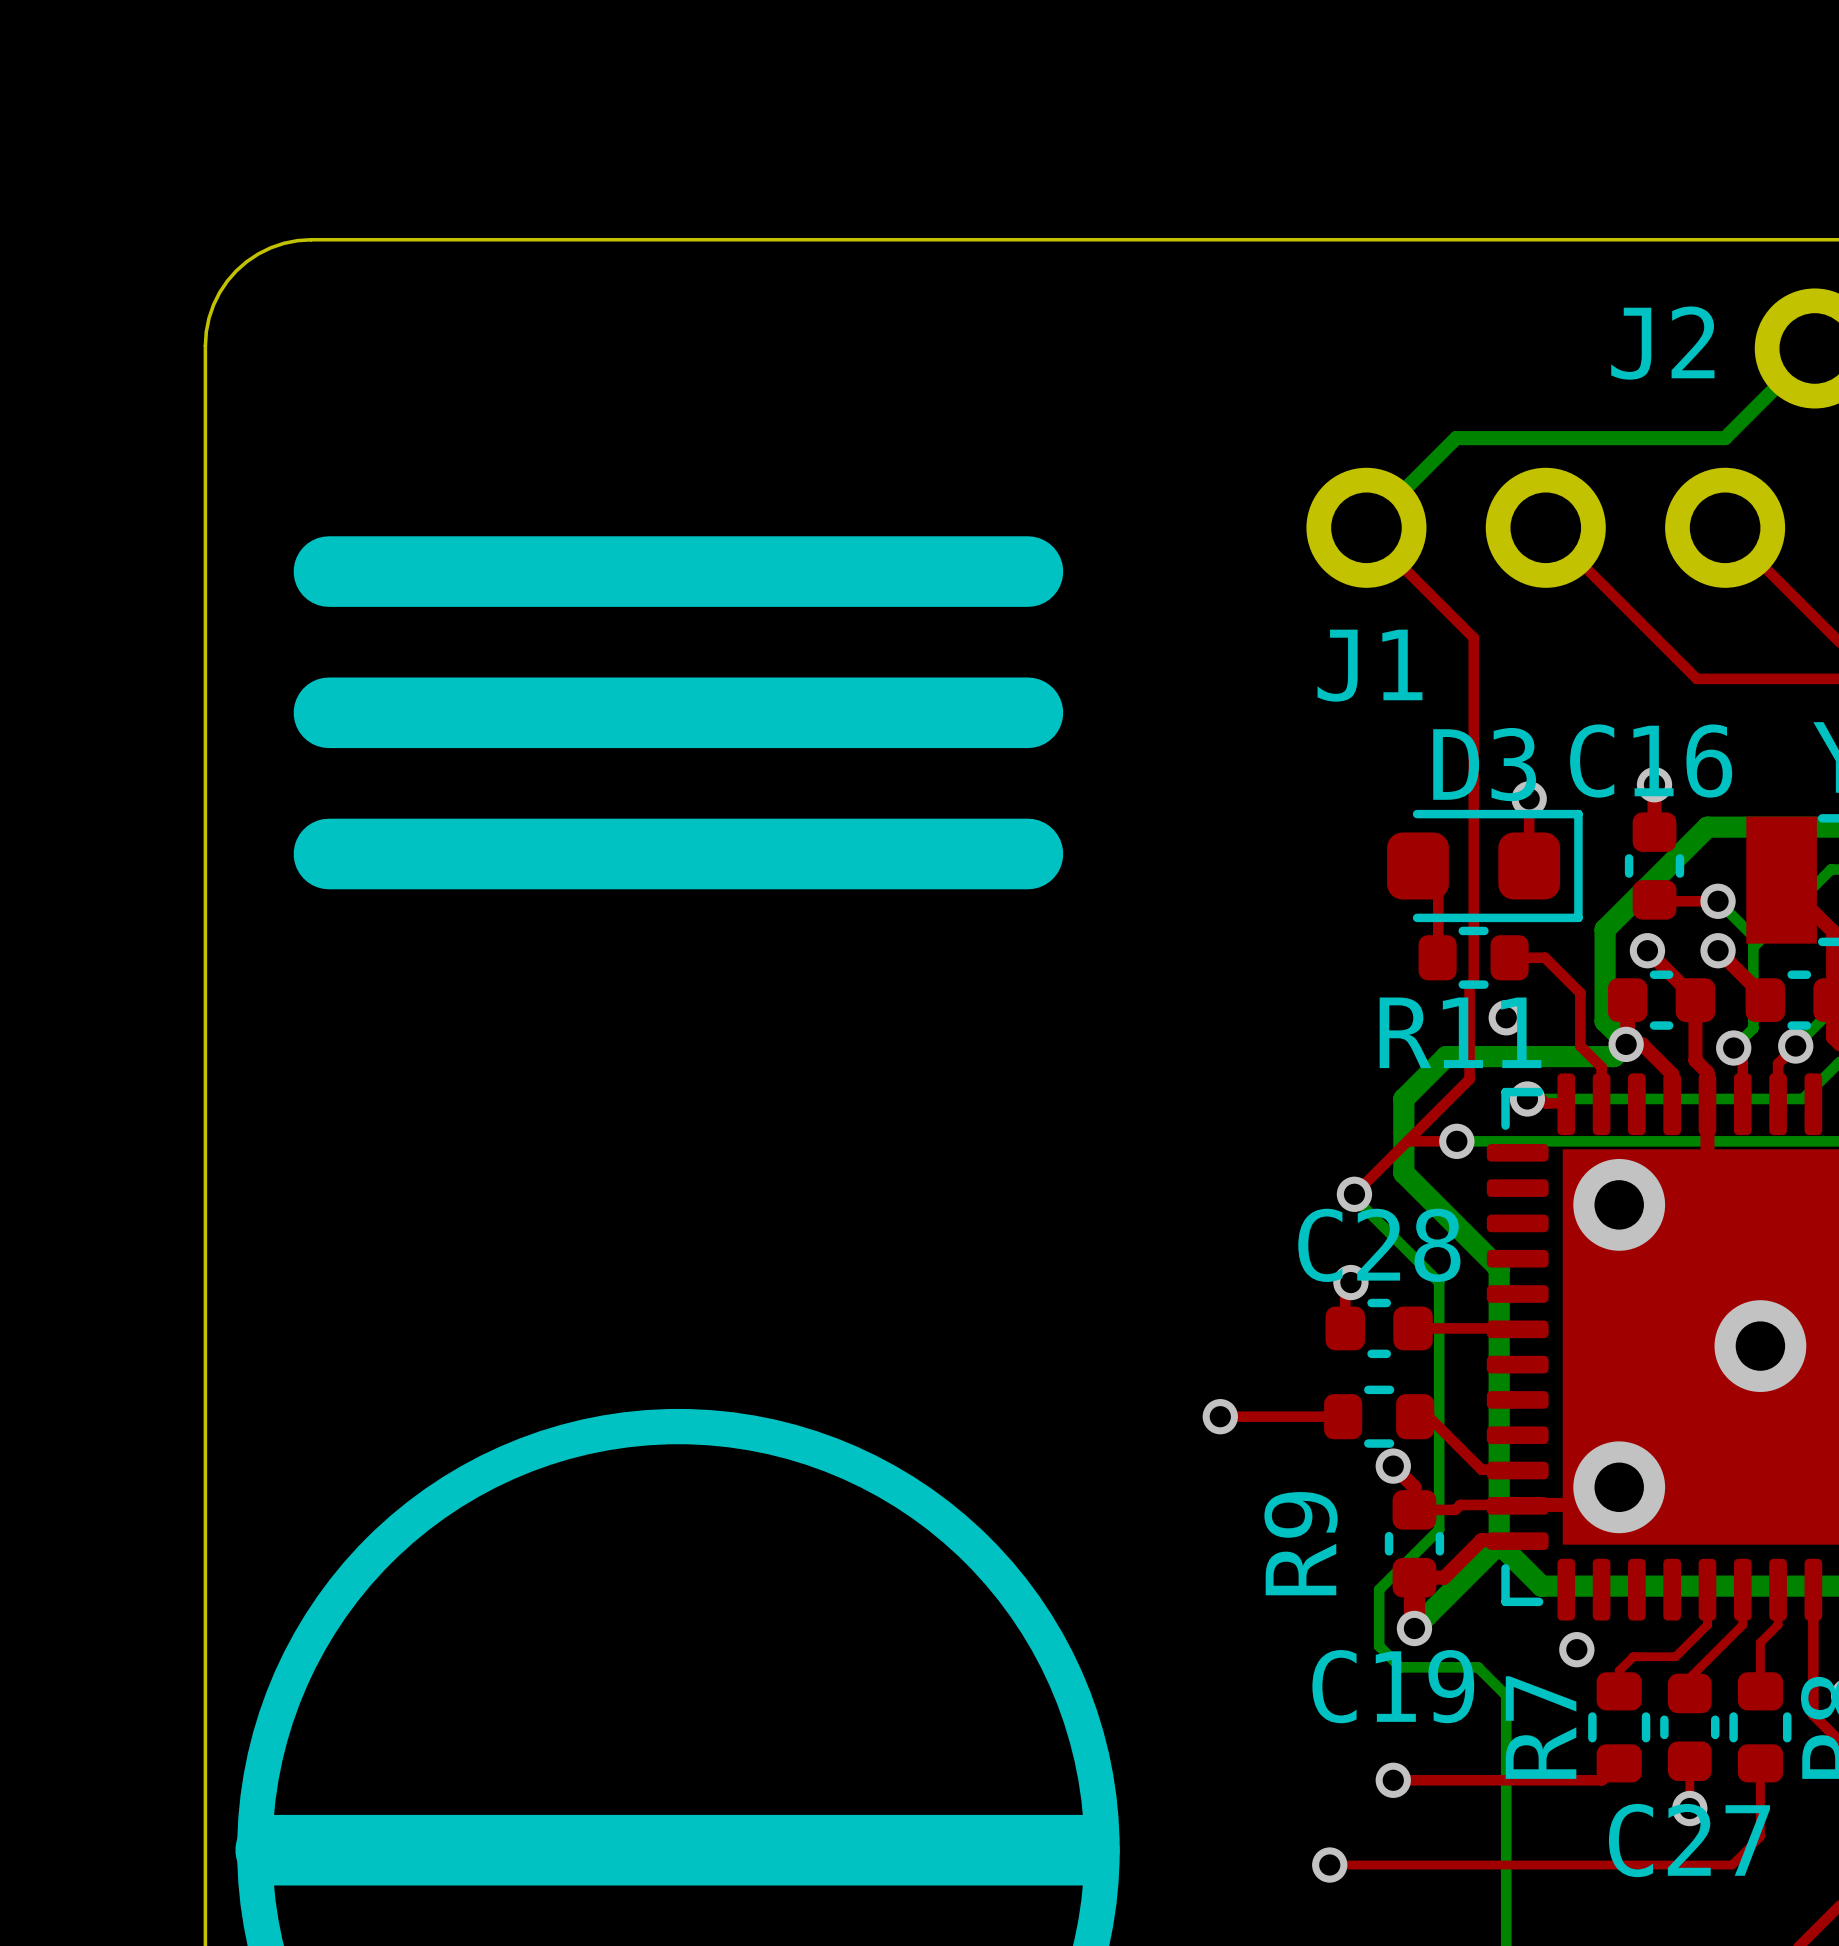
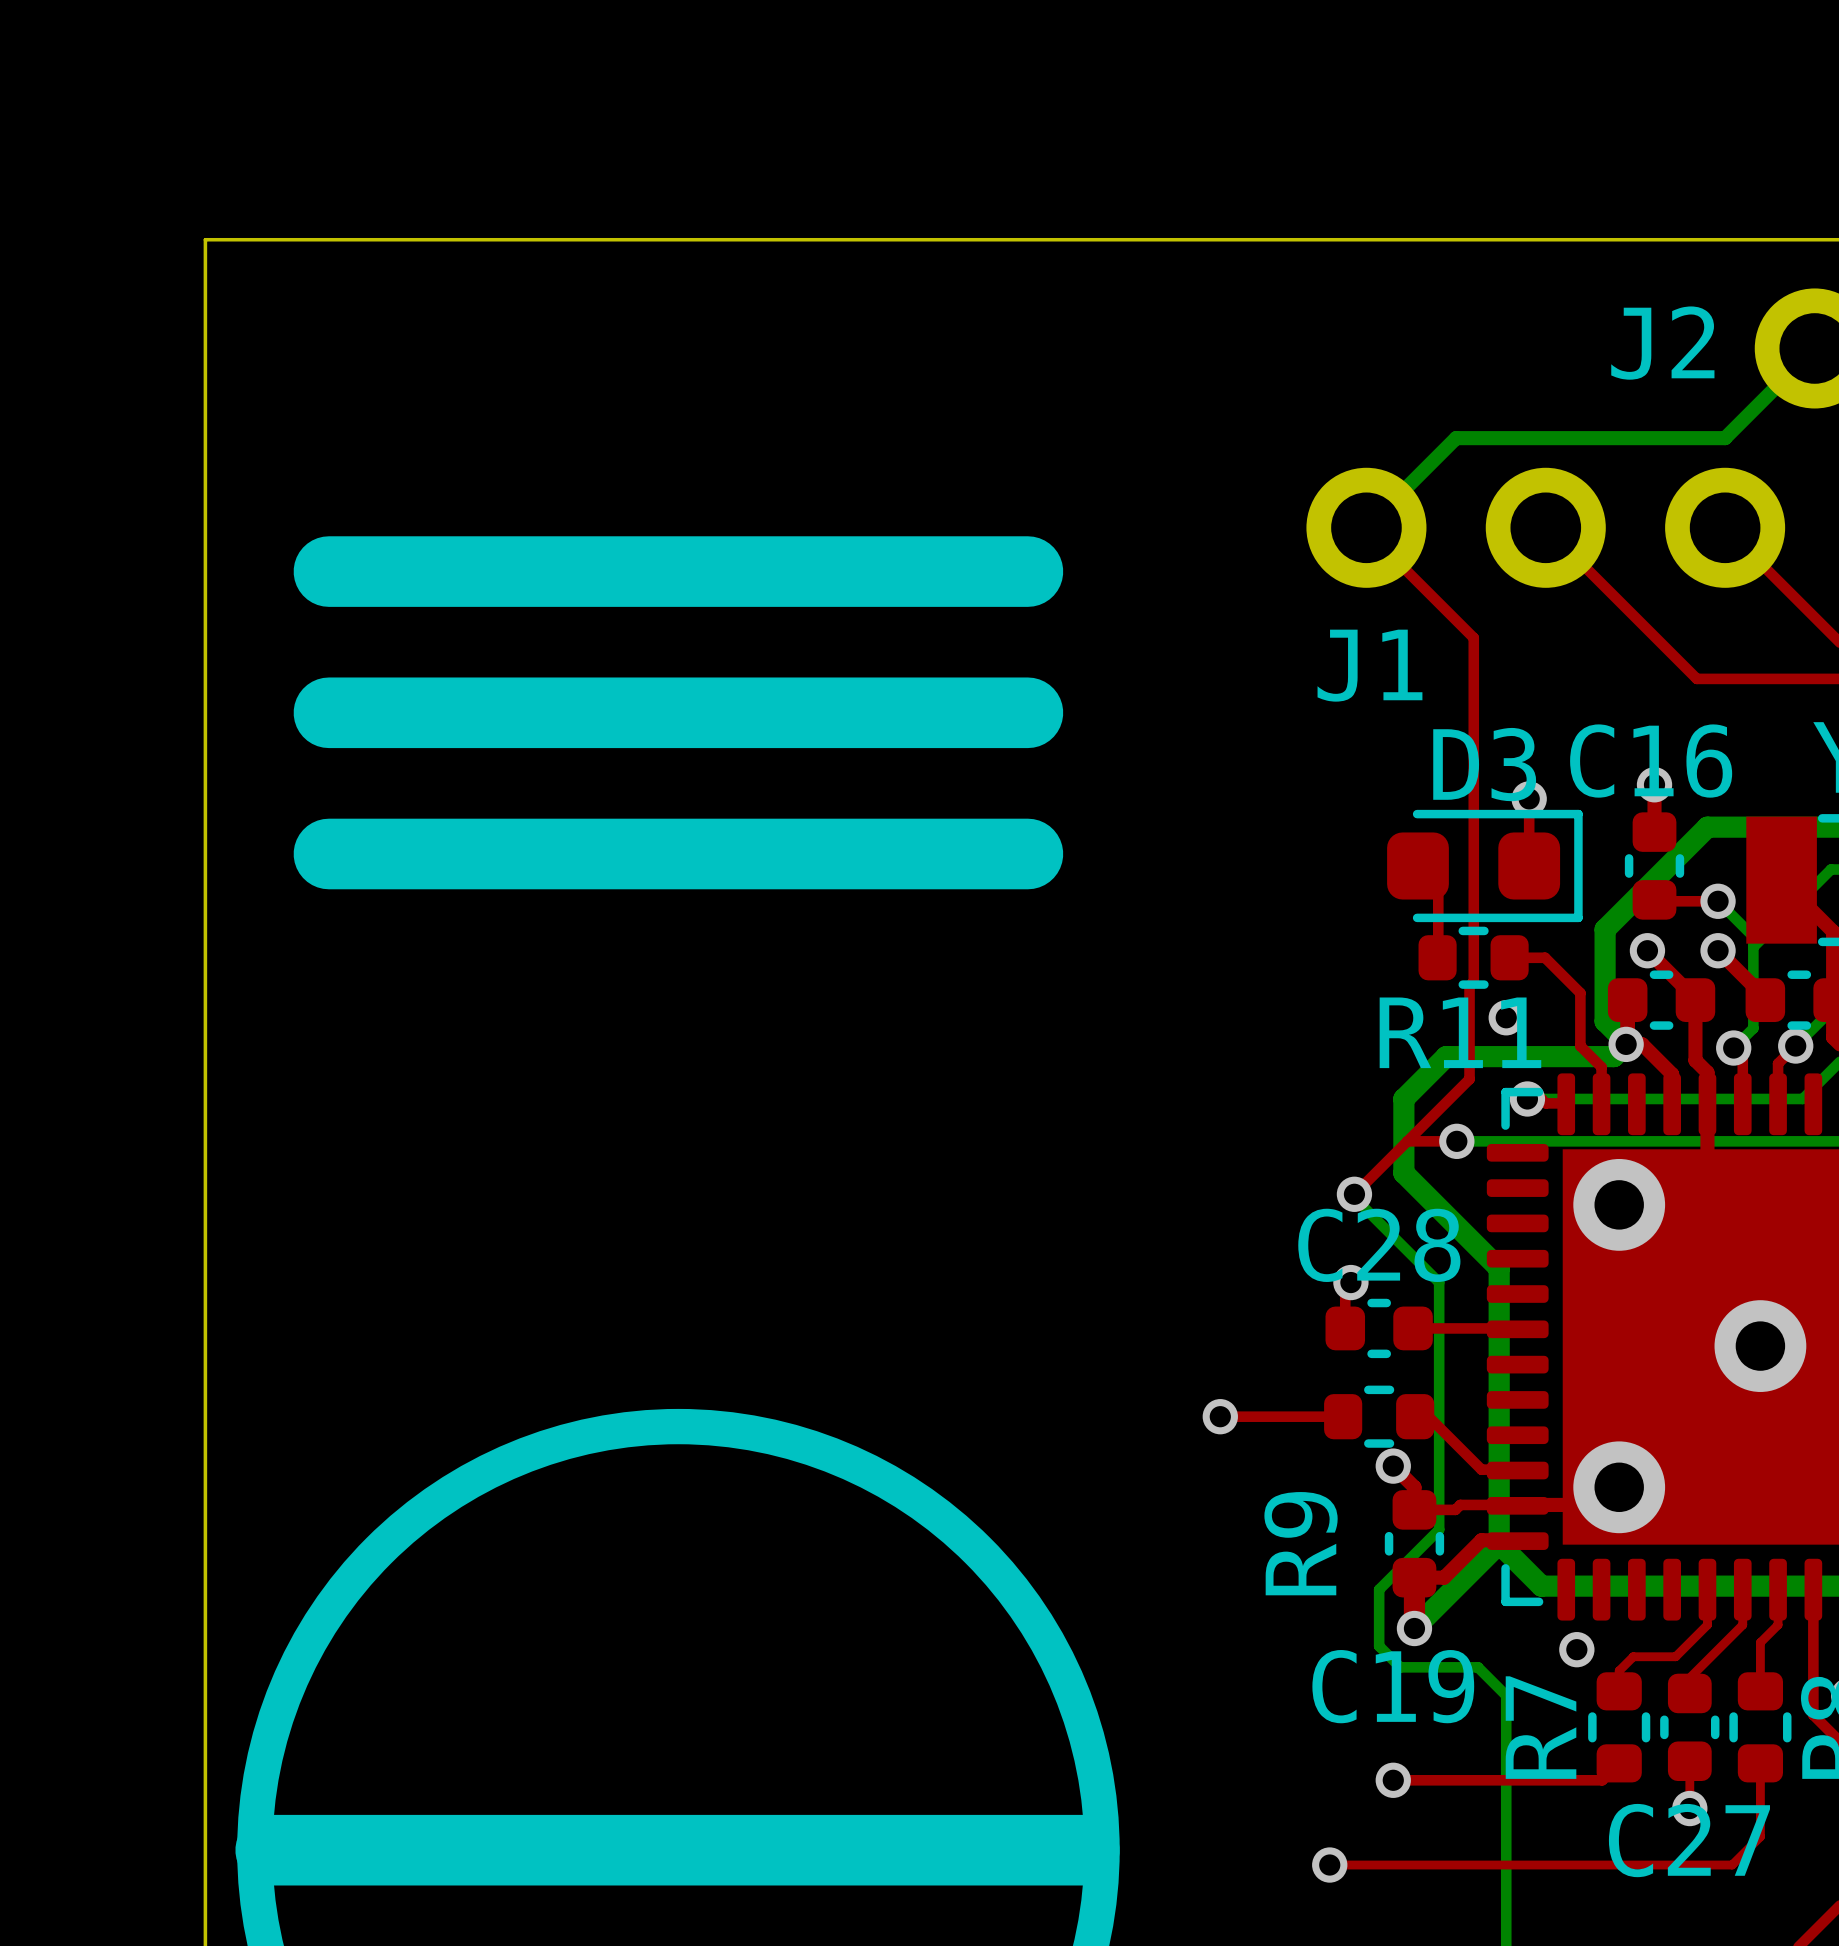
board edge: (311, 239) (297, 240) (270, 247) (258, 253) (236, 270) (219, 292) (213, 305) (206, 331) (205, 345) -> (311, 239) (205, 239) (205, 345)

